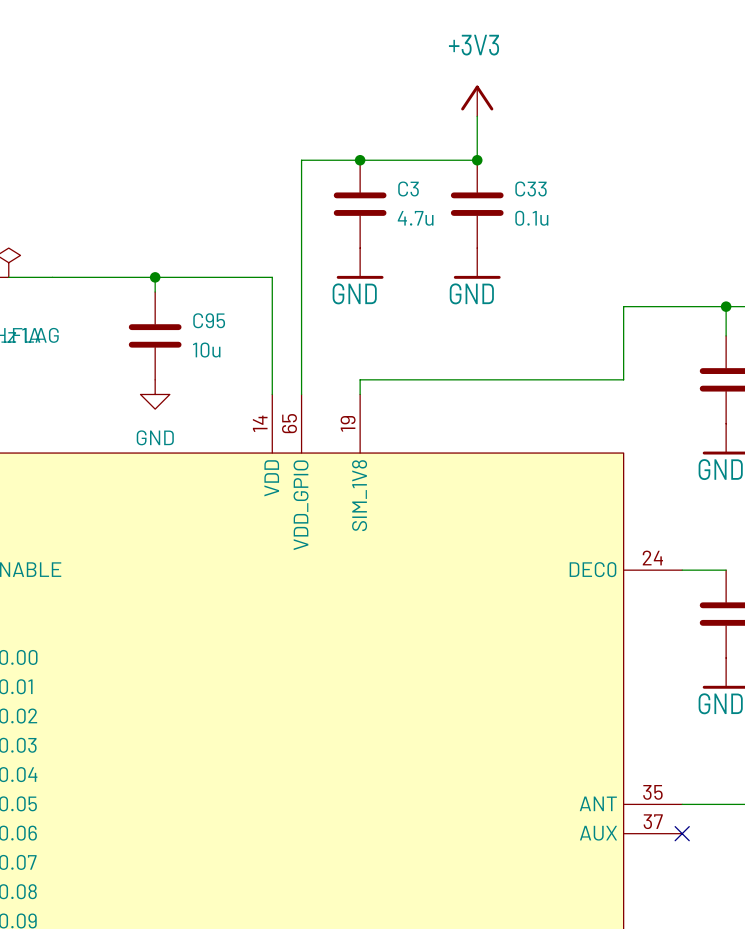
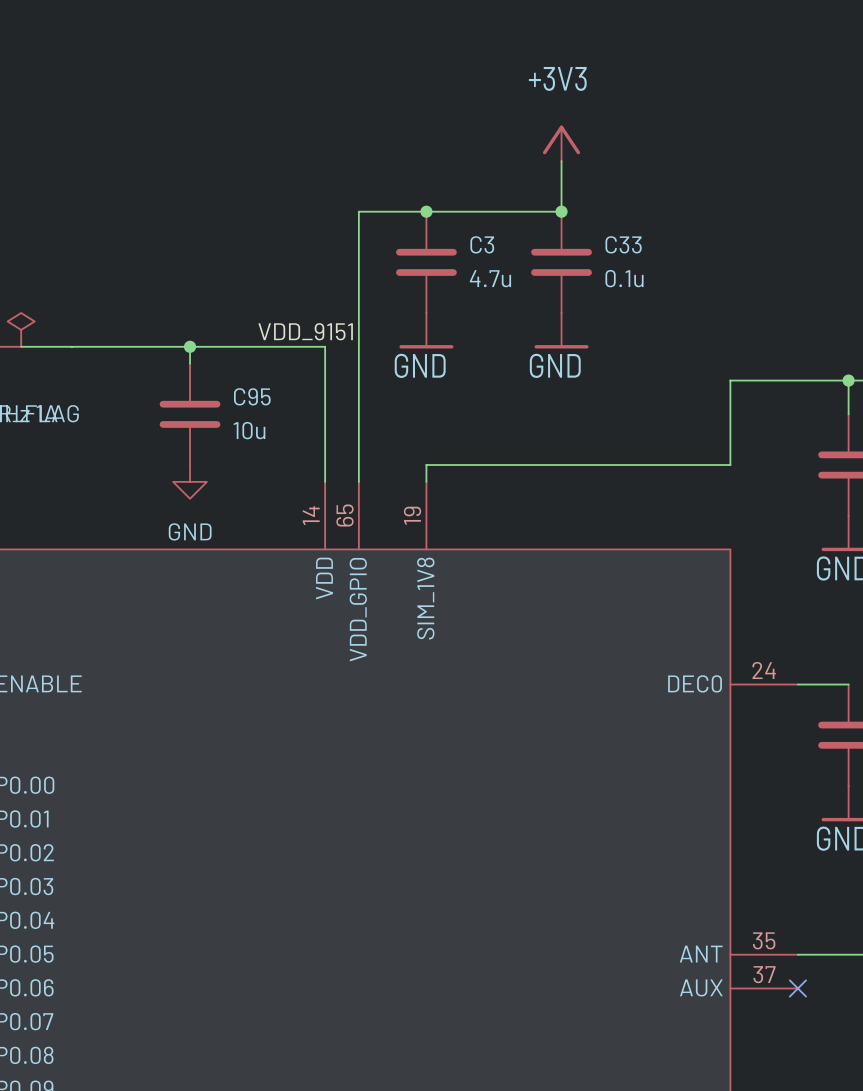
label: none -> VDD_9151 (305, 331)

